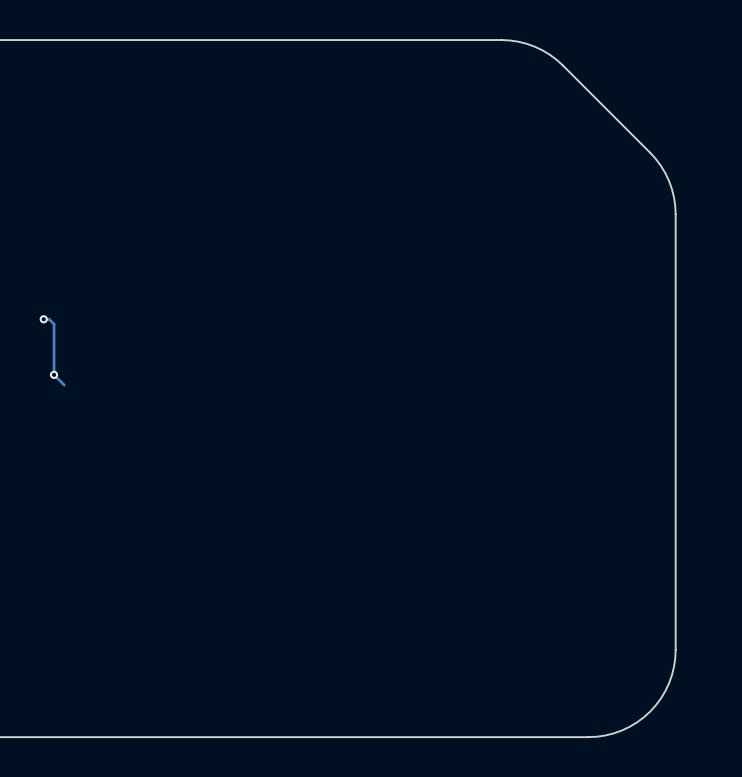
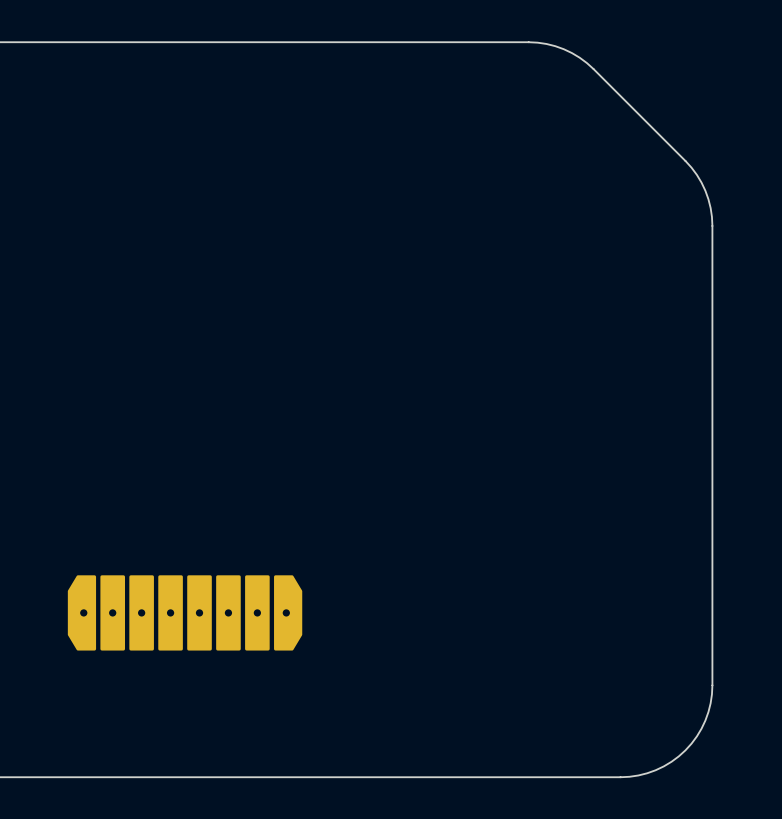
track: (43, 319) (49, 319) (54, 324) (54, 374) (64, 385) -> none
via: (43, 319) -> none
via: (54, 374) -> none
part: none -> (185, 612)

